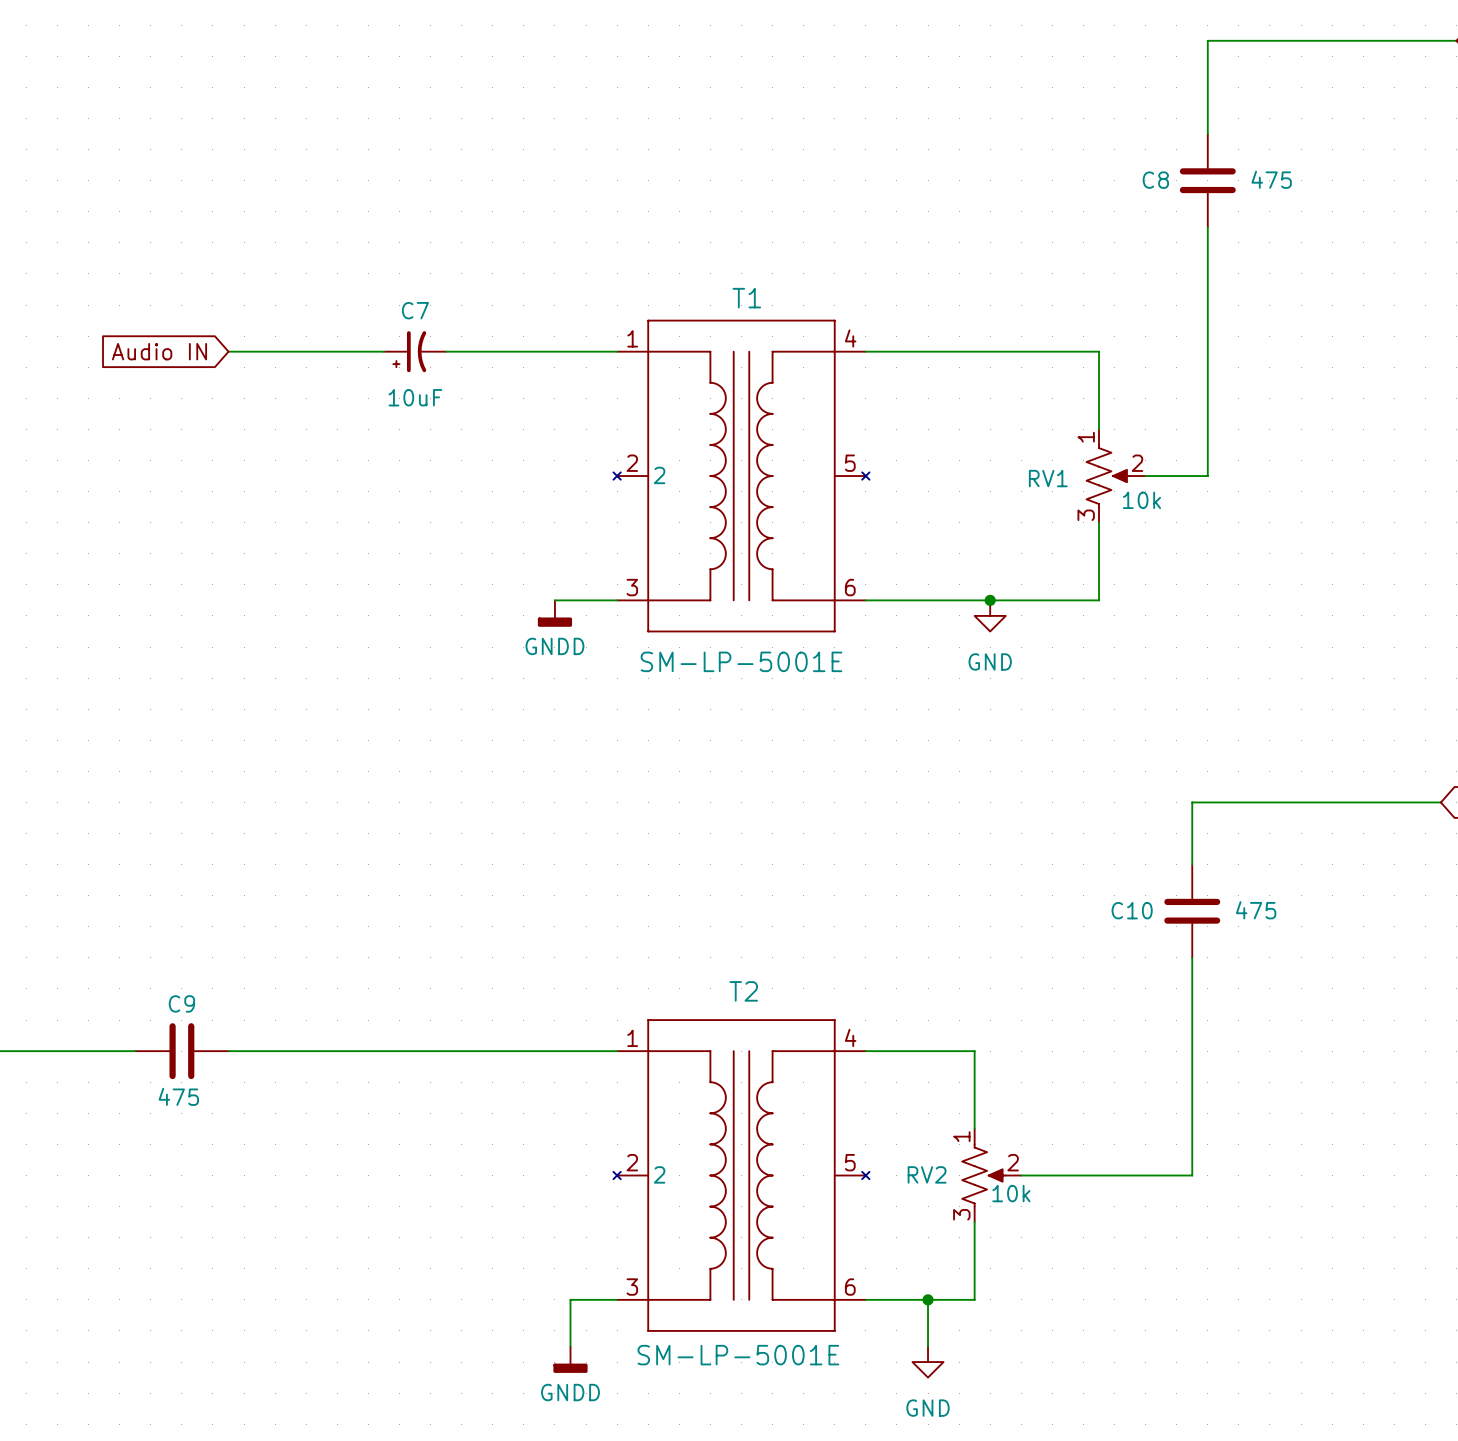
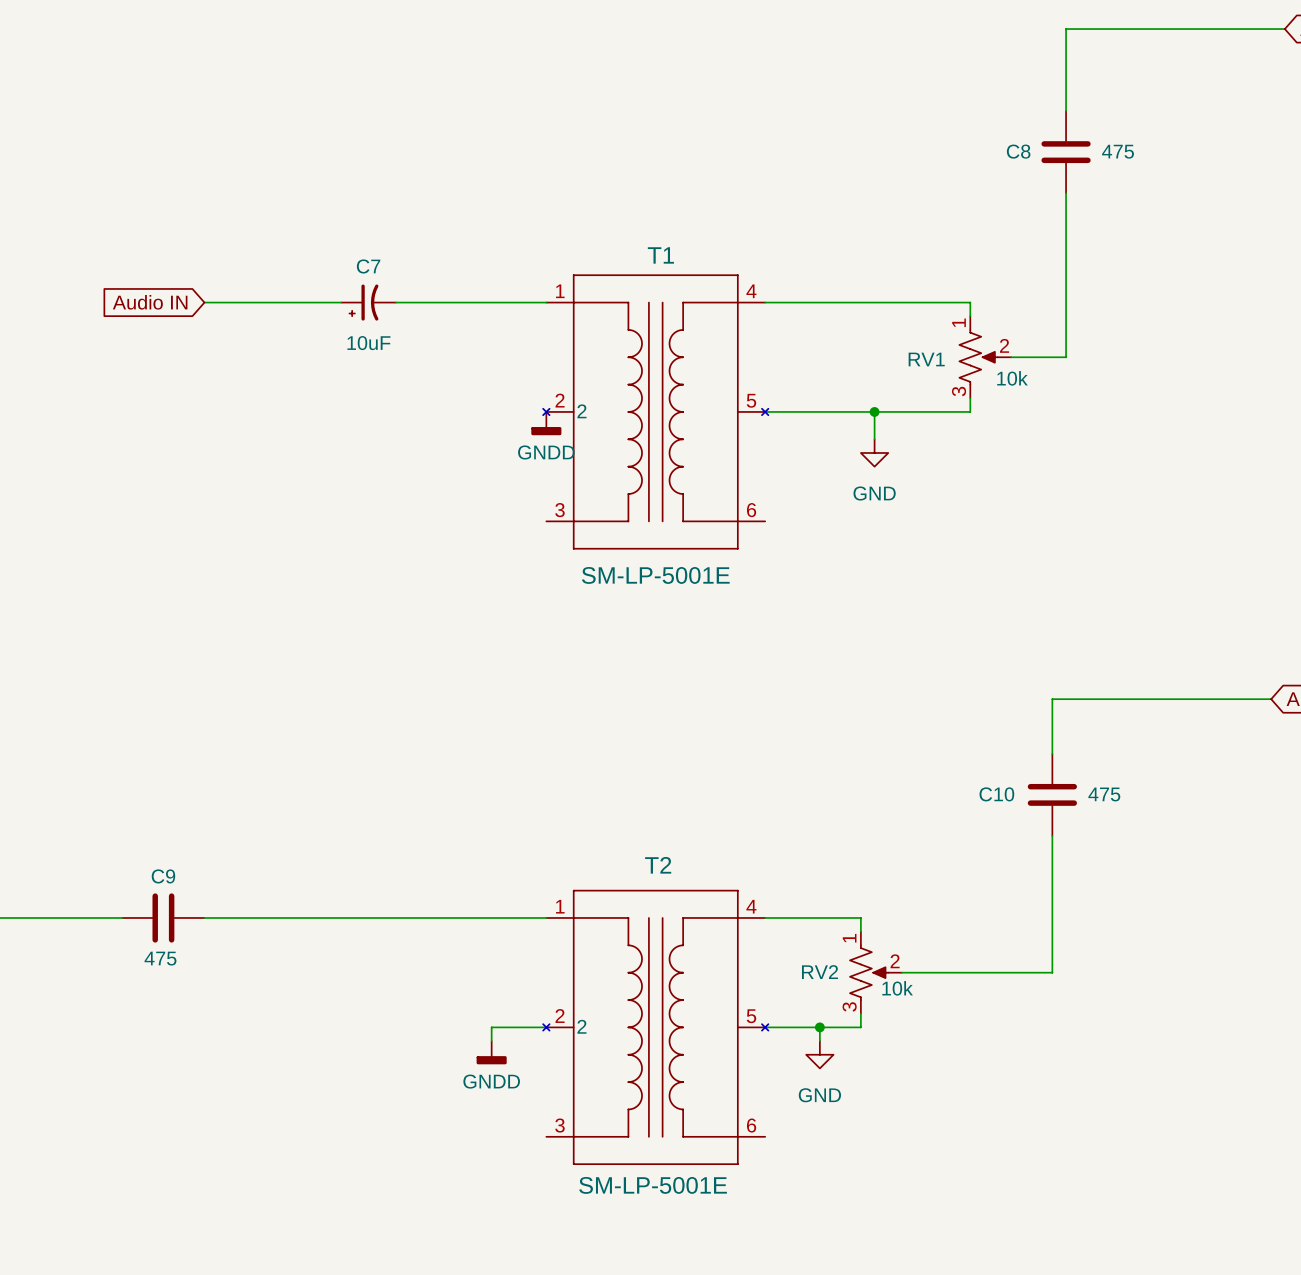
wire: (1098, 367) (1098, 429) -> none
wire: (1207, 413) (1207, 476) (1145, 476) -> (1066, 357) (1011, 357)
wire: none -> (970, 398) (970, 411) (765, 411)
wire: none -> (874, 411) (874, 439)
junction: none -> (874, 411)
RV1 position: (1116, 476) -> (985, 357)
wire: (1098, 522) (1098, 600) (865, 600) -> none
wire: (554, 600) (617, 600) -> none
junction: (990, 600) -> none
power symbol position: GNDD (554, 613) -> GNDD (546, 423)
power symbol position: GND (990, 615) -> GND (874, 452)
wire: (974, 1066) (974, 1128) -> none
wire: (1192, 1113) (1192, 1175) (1021, 1175) -> (1052, 972) (901, 972)
wire: none -> (860, 1013) (860, 1027) (765, 1027)
wire: none -> (546, 1027) (491, 1027) (491, 1041)
wire: none -> (819, 1027) (819, 1041)
junction: none -> (819, 1027)
RV2 position: (991, 1175) -> (875, 972)
wire: (974, 1222) (974, 1299) (865, 1299) -> none
wire: (617, 1299) (570, 1299) (570, 1346) -> none
wire: (928, 1299) (928, 1346) -> none
junction: (928, 1299) -> none
power symbol position: GNDD (570, 1359) -> GNDD (491, 1052)
power symbol position: GND (928, 1362) -> GND (819, 1054)

